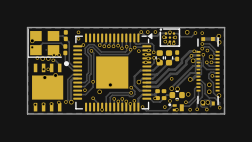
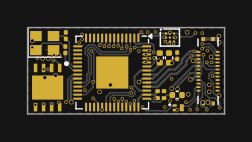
via: (78, 32) -> none
via: none -> (82, 34)
via: (78, 38) -> none
via: none -> (82, 39)
via: none -> (79, 42)
via: (83, 45) -> none
via: none -> (171, 63)

